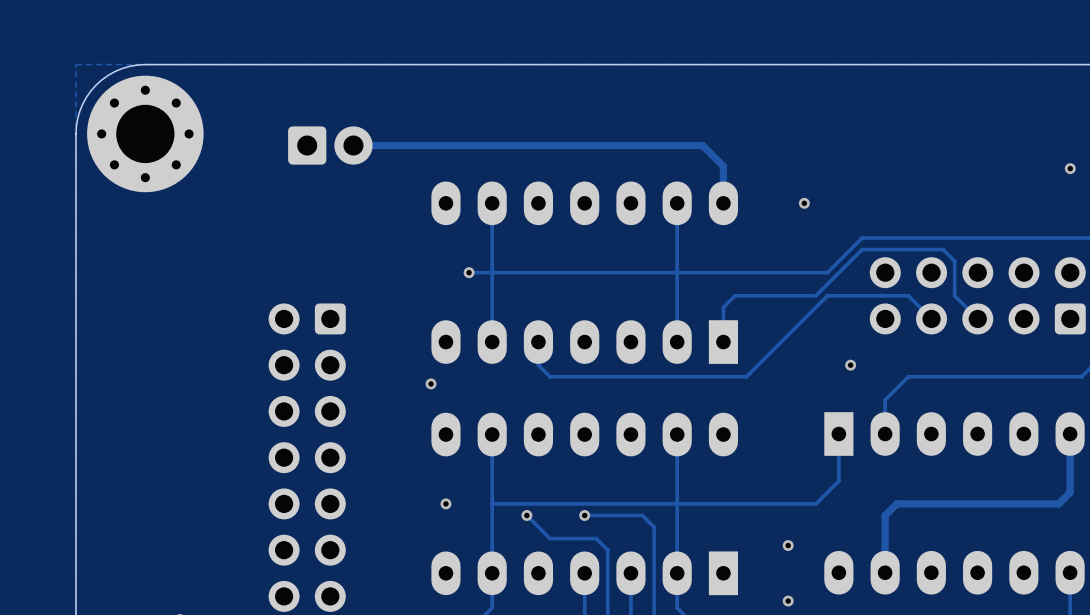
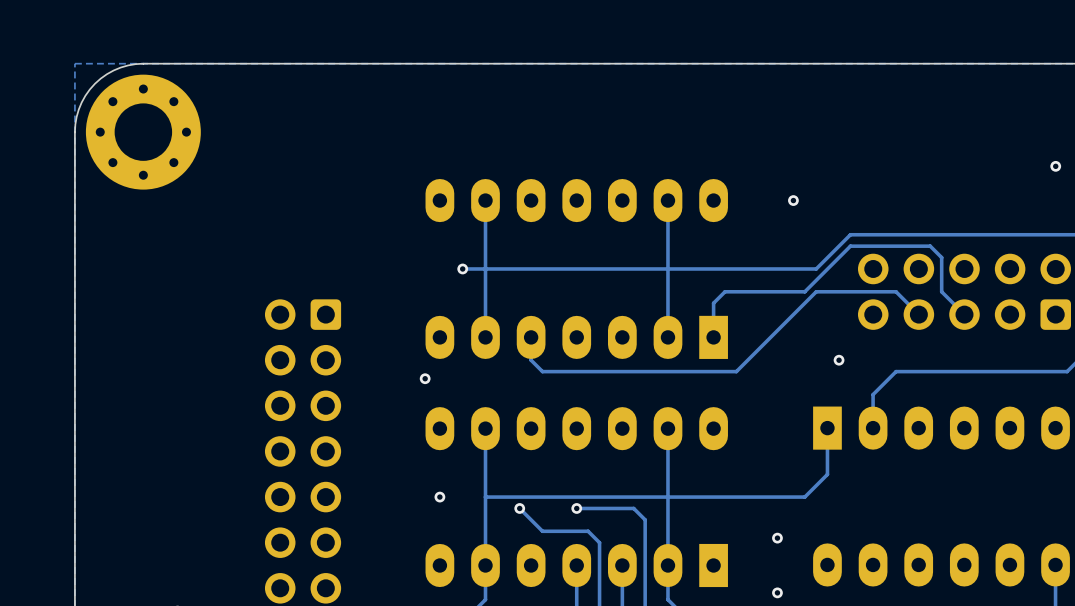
part: (330, 145) -> none
track: (353, 145) (702, 145) (723, 166) (723, 212) -> none
track: (1070, 434) (1070, 492) (1058, 503) (896, 503) (885, 515) (885, 572) -> none

